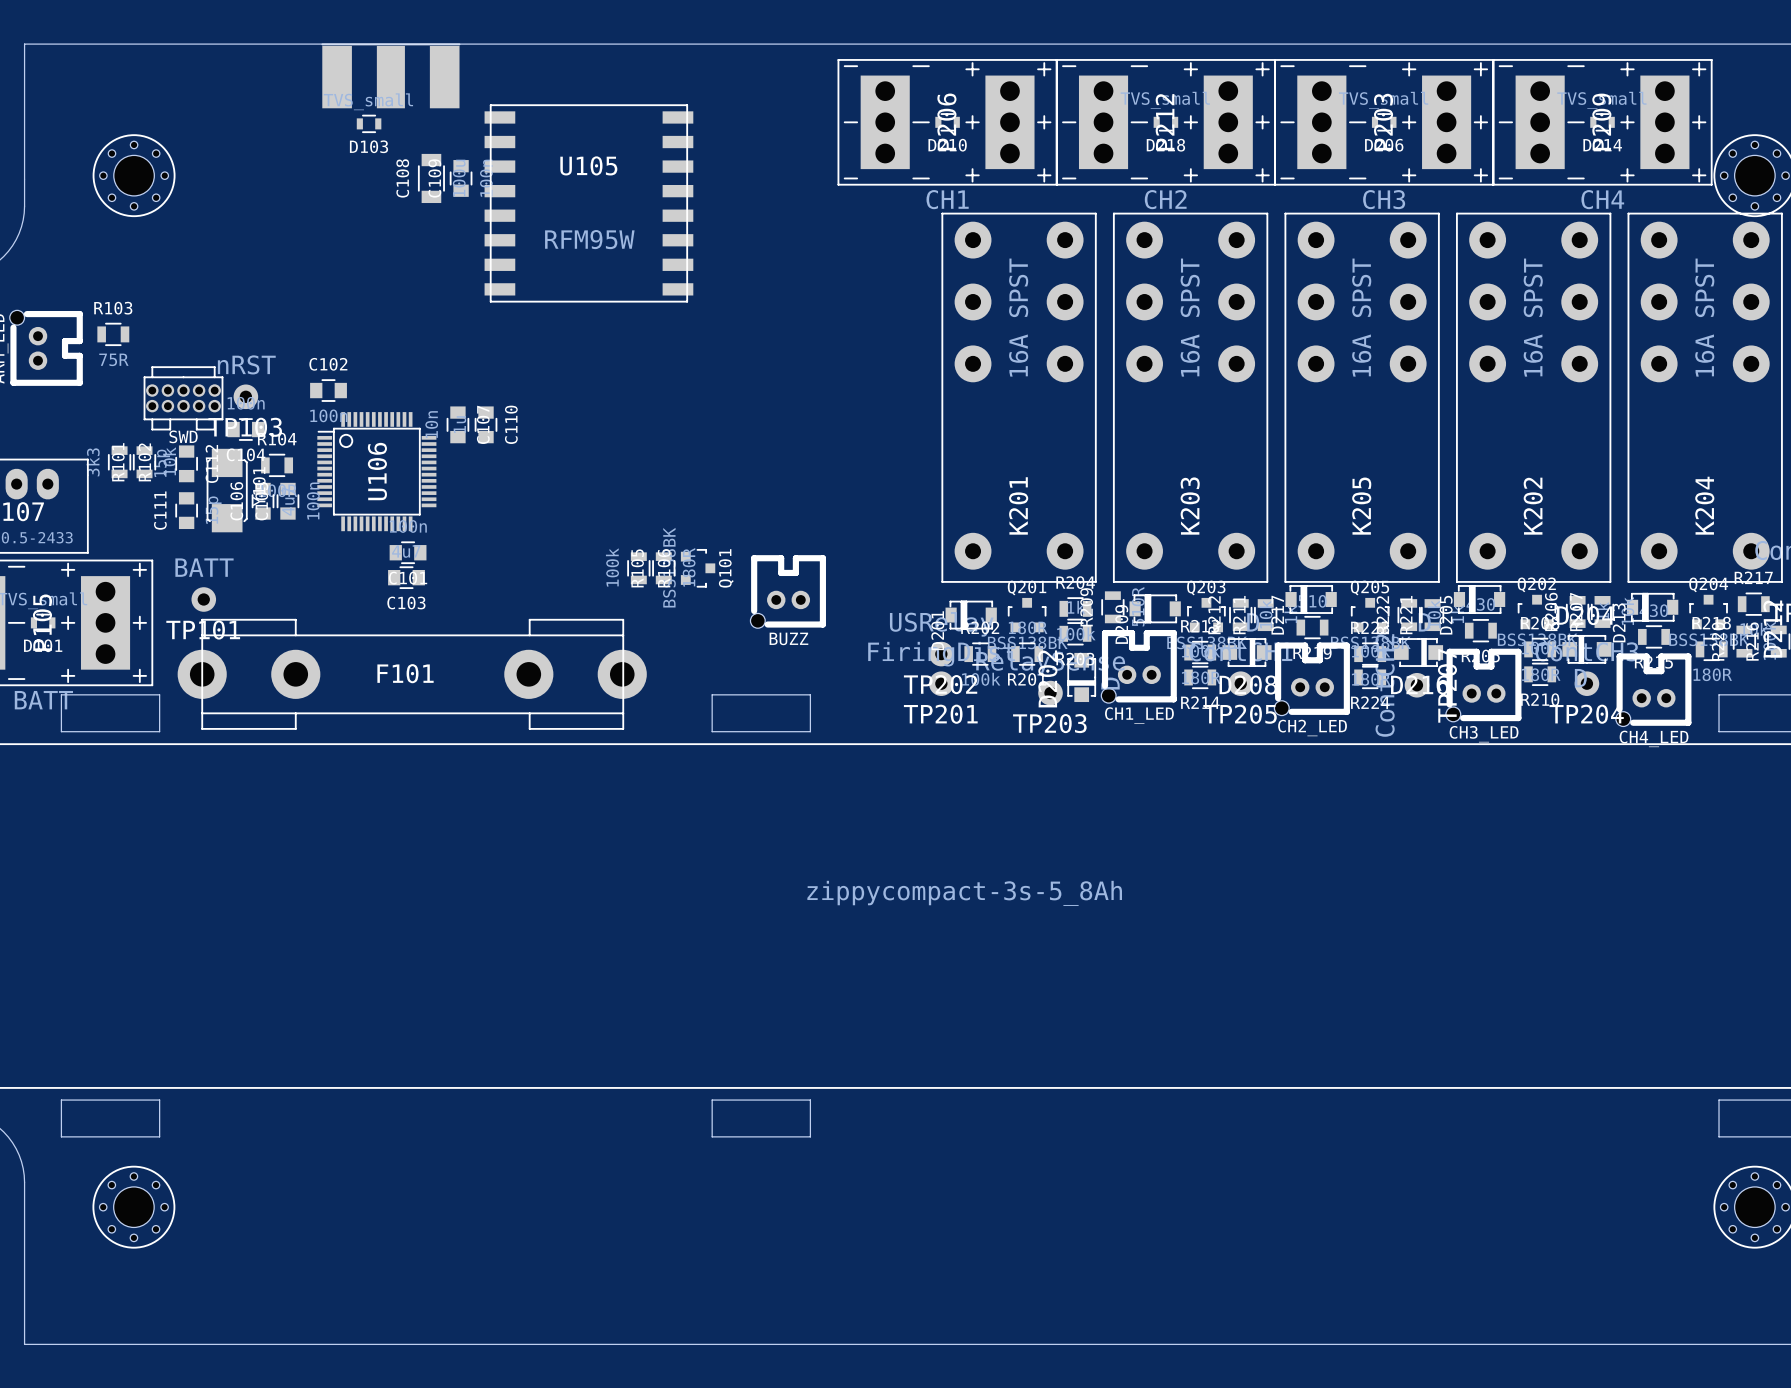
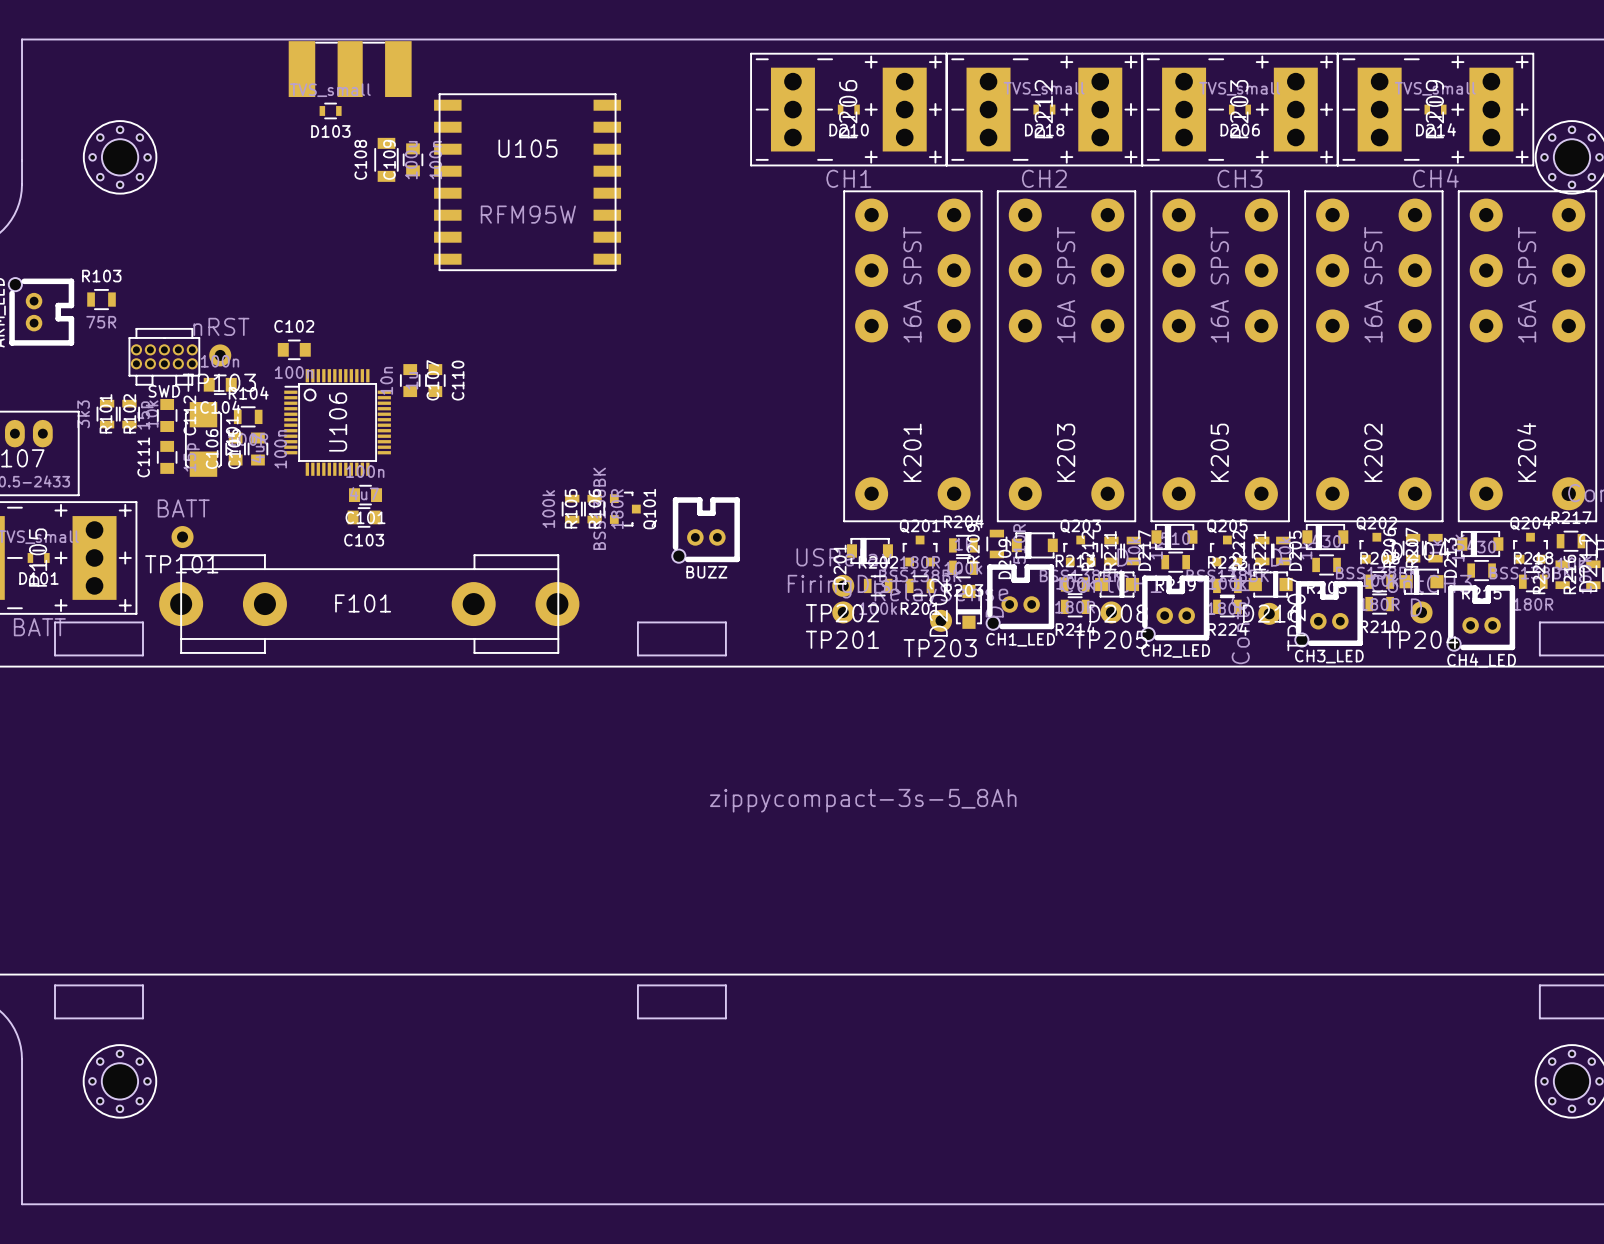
part footprint: [321, 43, 461, 109] -> [288, 41, 412, 98]

